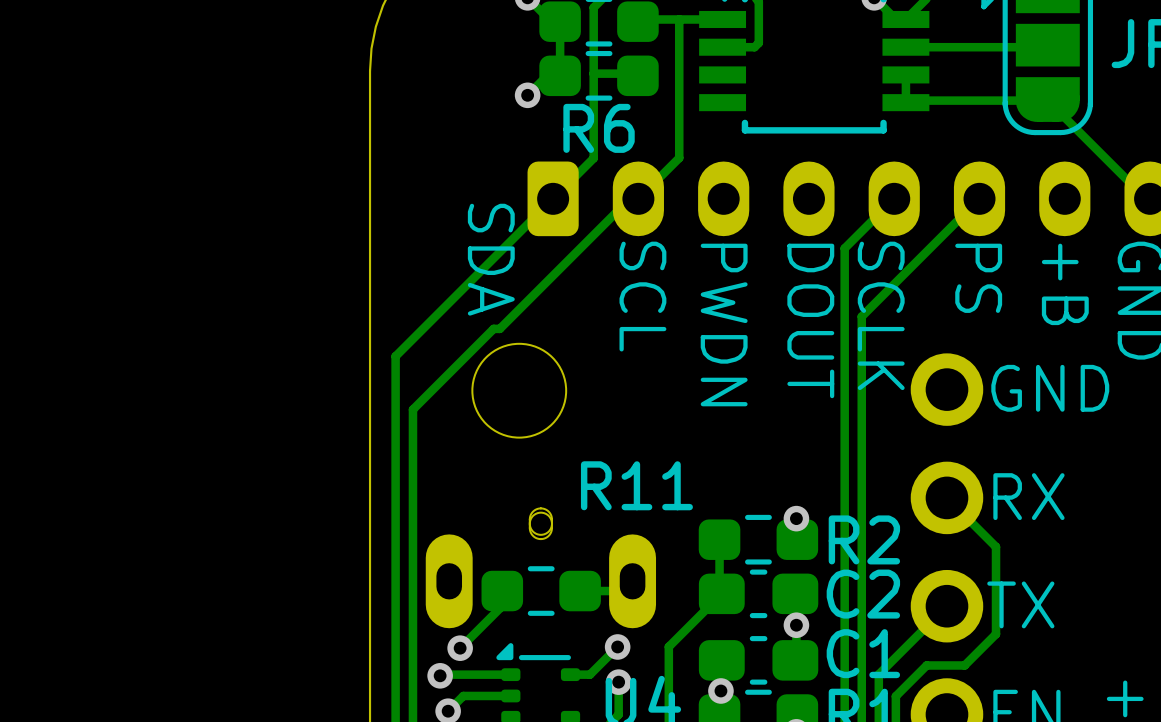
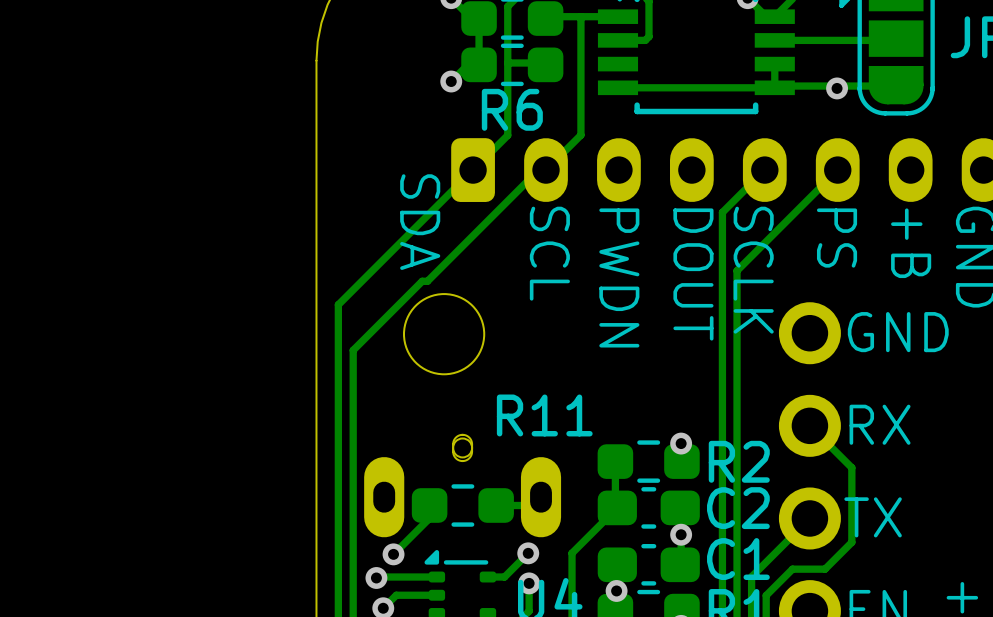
track: (1047, 100) (1146, 198) -> none
track: none -> (774, 87) (617, 87)
via: none -> (837, 88)

